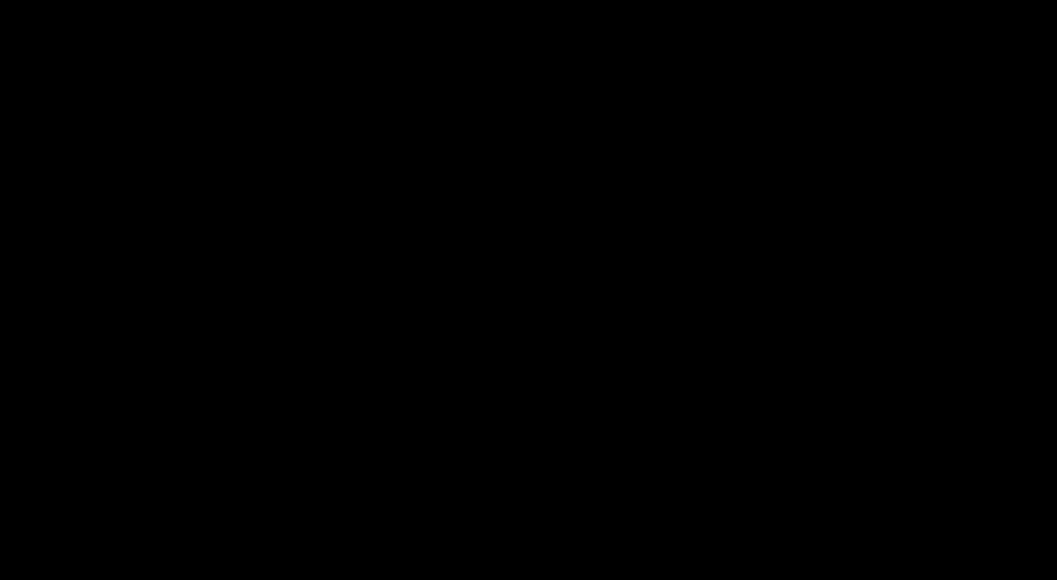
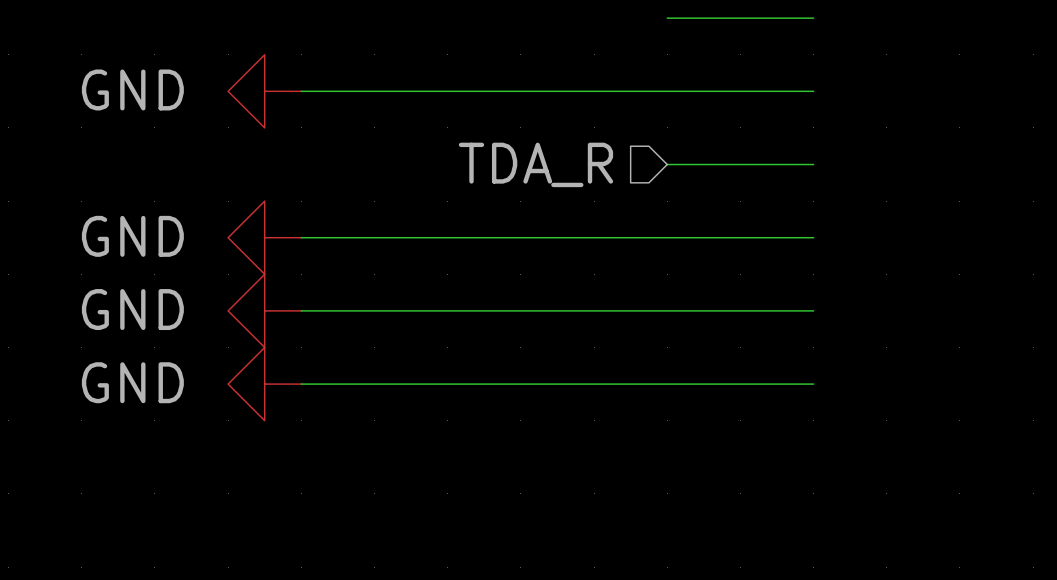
wire: none -> (667, 18) (813, 18)
power symbol: none -> GND (264, 91)
wire: none -> (301, 91) (813, 91)
wire: none -> (667, 164) (813, 164)
hierarchical label: none -> TDA_R (535, 164)
power symbol: none -> GND (264, 237)
wire: none -> (301, 237) (813, 237)
power symbol: none -> GND (264, 310)
wire: none -> (301, 310) (813, 310)
power symbol: none -> GND (264, 384)
wire: none -> (301, 384) (813, 384)

